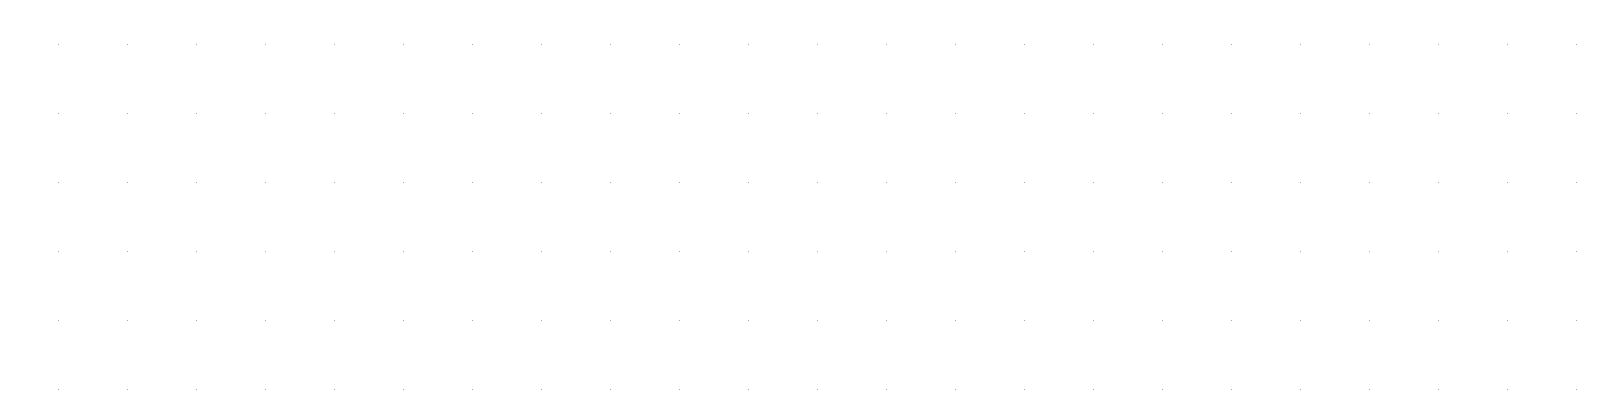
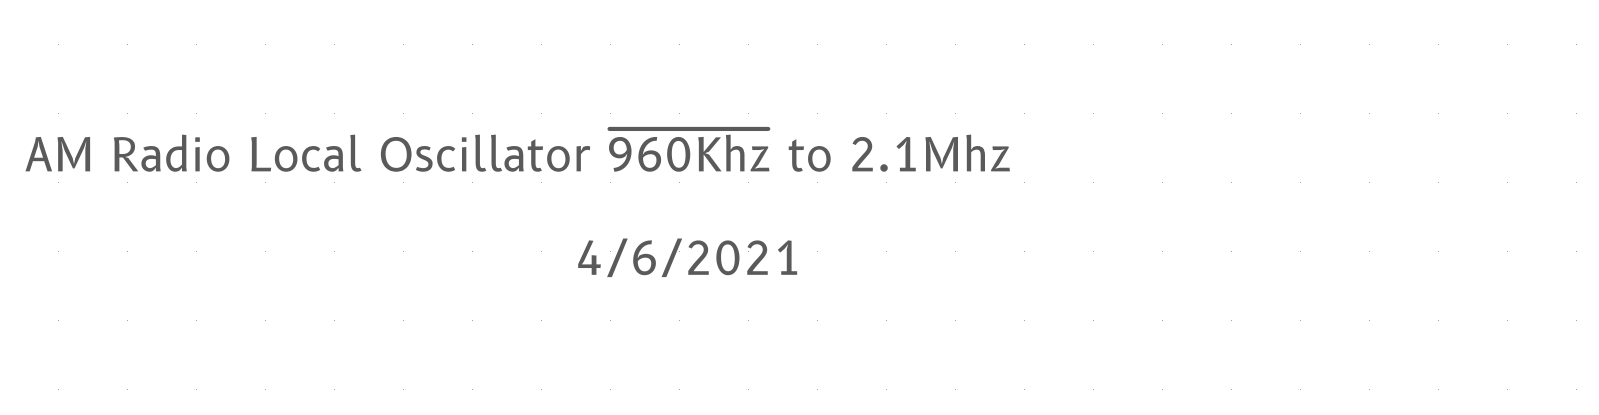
text: none -> AM Radio Local Oscillator ~{960Khz} to 2.1Mhz (517, 150)
text: none -> 4/6/2021 (687, 257)

